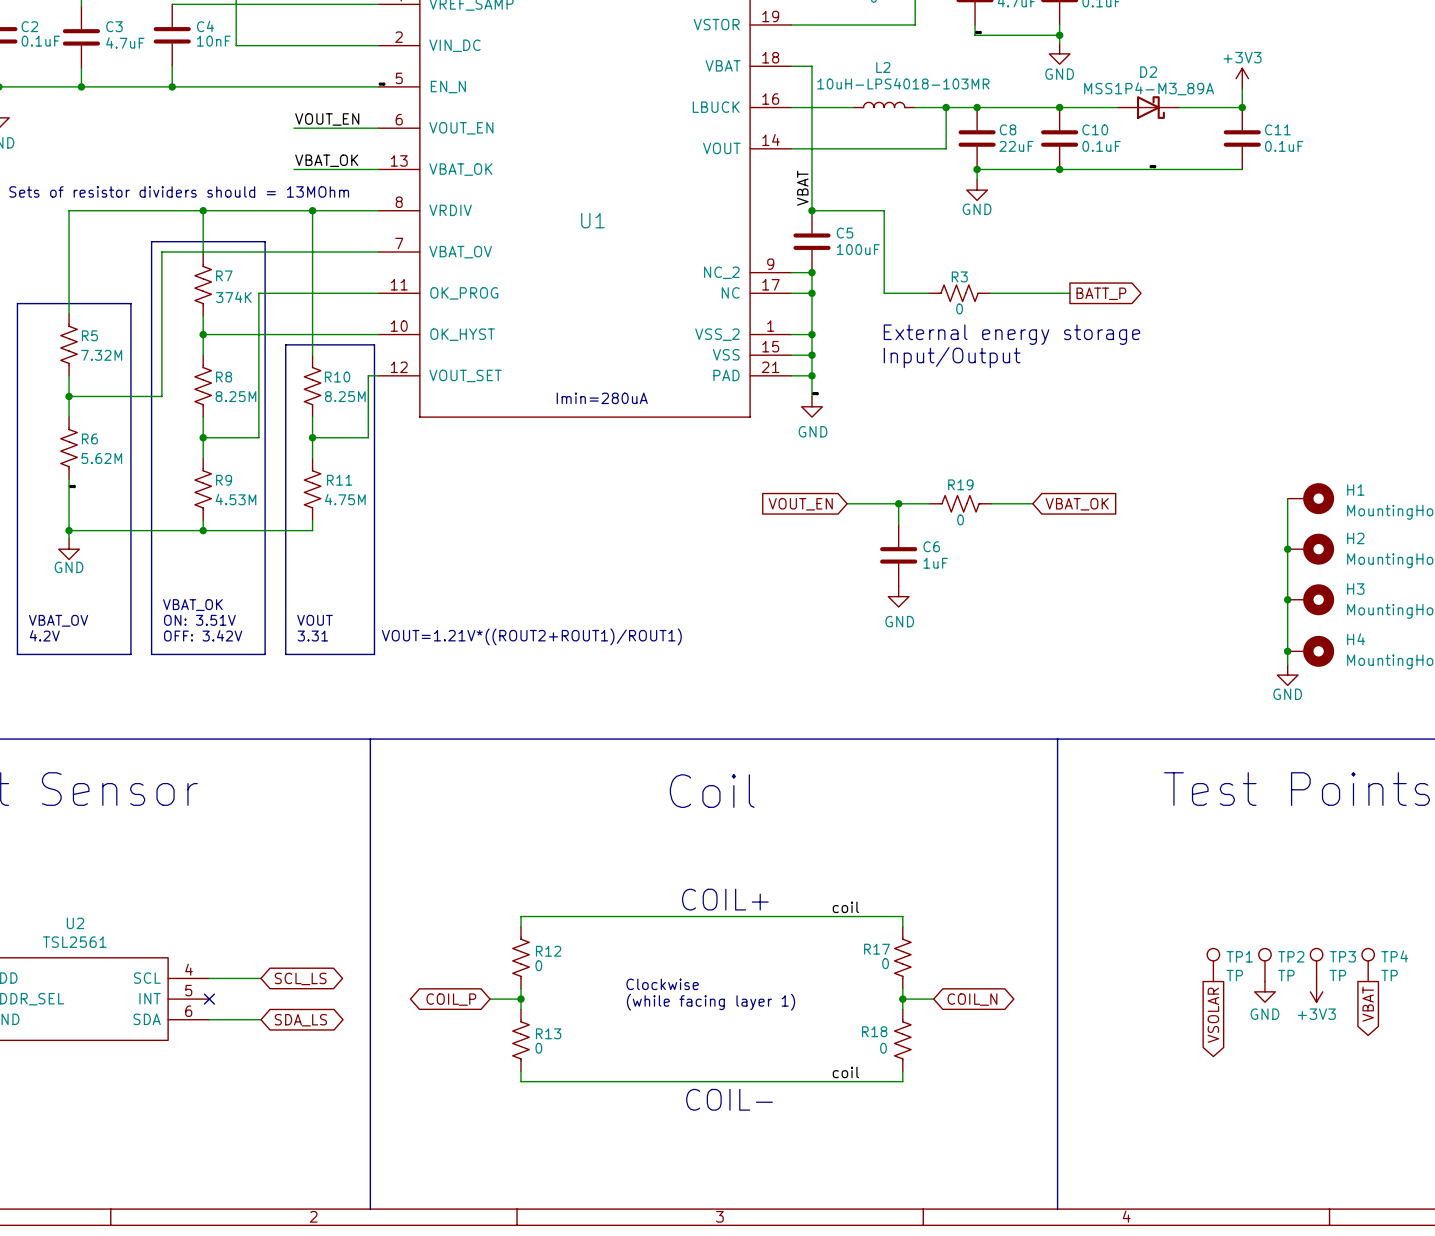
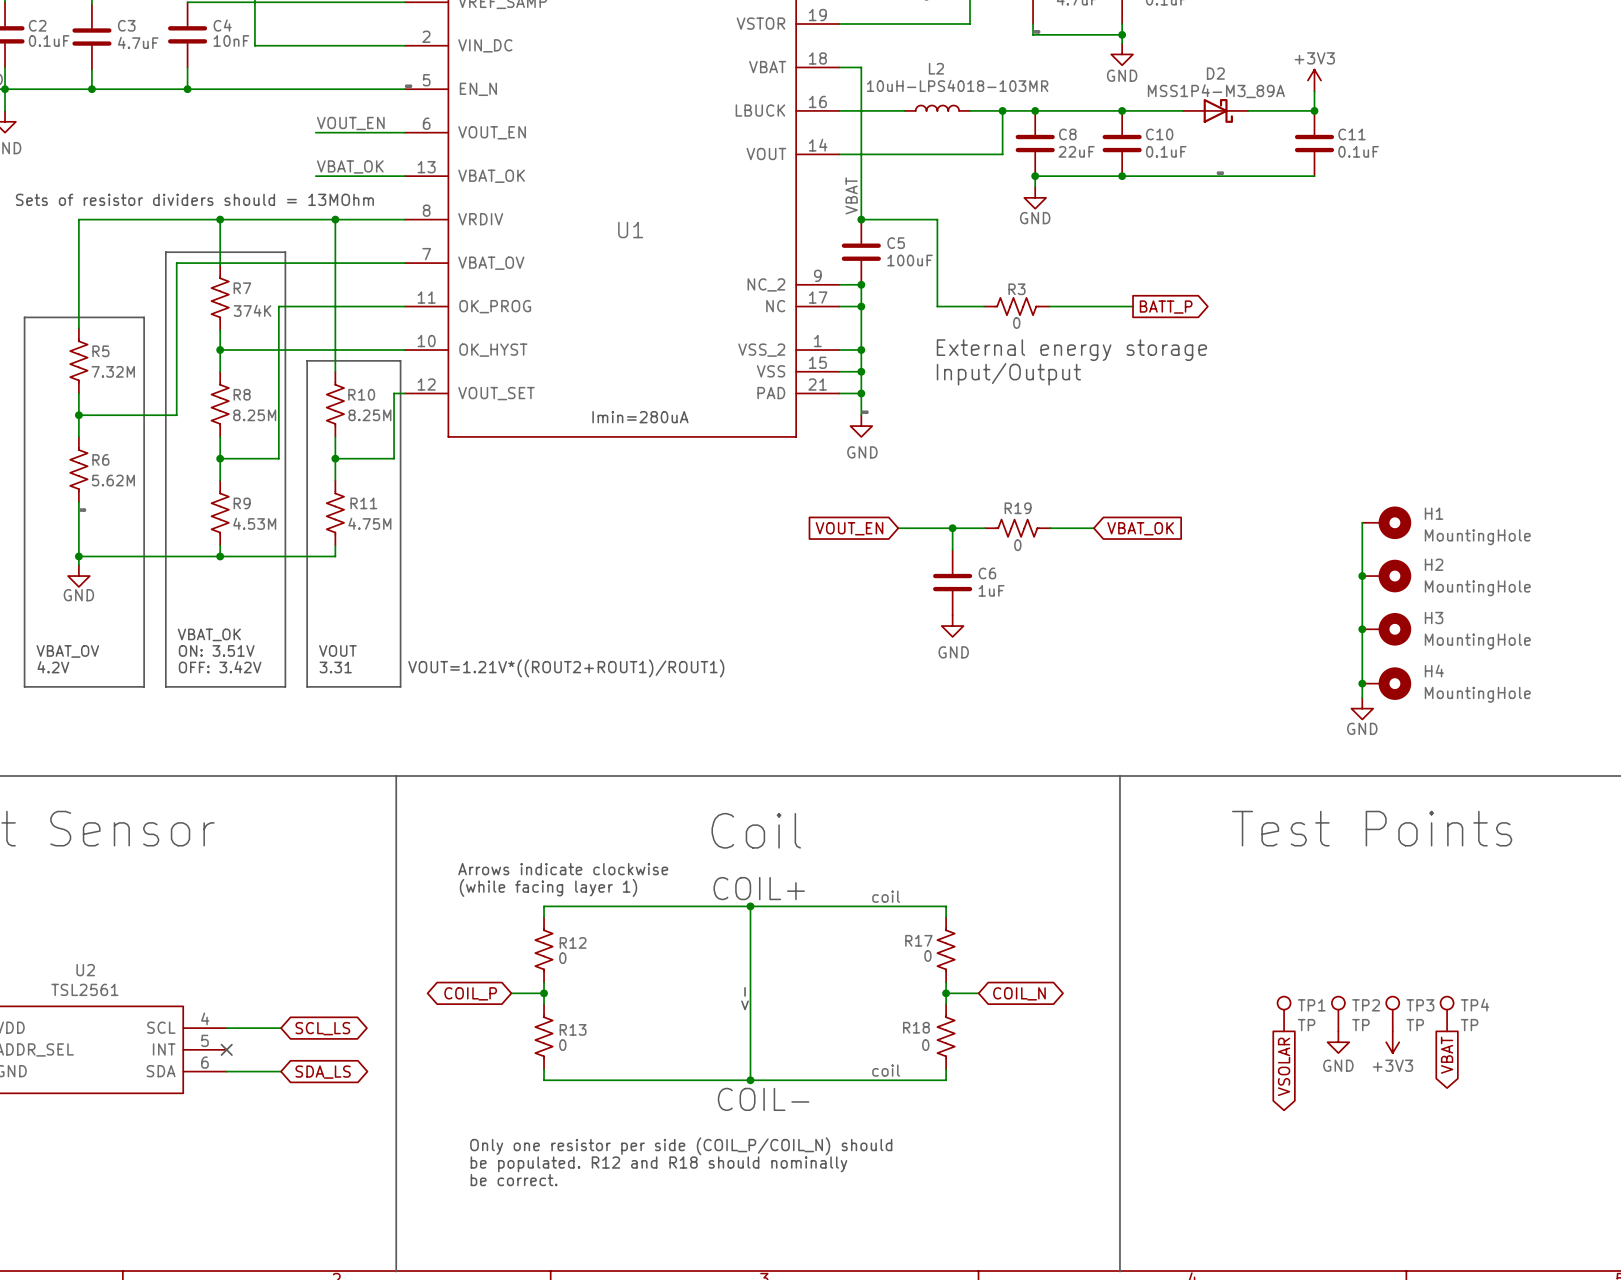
text: none -> Arrows indicate clockwise (563, 869)
text: none -> (while facing layer 1) (548, 887)
wire: none -> (750, 906) (750, 1080)
junction: none -> (750, 906)
text position: COIL+ (725, 899) -> COIL+ (759, 888)
label position: coil (845, 907) -> coil (886, 896)
wire: (521, 926) (521, 916) (902, 916) (902, 926) -> (544, 917) (544, 906) (946, 906) (946, 917)
junction: none -> (544, 993)
junction: none -> (946, 993)
text: none -> <- (745, 998)
R12 position: (521, 957) -> (544, 949)
R17 position: (902, 957) -> (946, 949)
text: Clockwise (662, 984) -> none
wire: (521, 988) (521, 1009) -> (544, 982) (544, 1004)
wire: (902, 988) (902, 1009) -> (946, 982) (946, 1004)
global label position: COIL_P (451, 999) -> COIL_P (470, 993)
wire: (490, 999) (521, 999) -> (511, 993) (544, 993)
junction: (521, 999) -> none
wire: (902, 999) (933, 999) -> (946, 993) (978, 993)
junction: (902, 999) -> none
global label position: COIL_N (972, 999) -> COIL_N (1019, 993)
text: (while facing layer 1) (710, 1002) -> none
junction: none -> (750, 1080)
R13 position: (521, 1040) -> (544, 1036)
R18 position: (902, 1040) -> (946, 1036)
wire: (521, 1071) (521, 1081) (902, 1081) (902, 1071) -> (544, 1069) (544, 1080) (946, 1080) (946, 1069)
label position: coil (845, 1072) -> coil (886, 1070)
text: none -> Only one resistor per side (COIL_P/COIL_N) should (681, 1146)
text position: COIL- (729, 1099) -> COIL- (763, 1099)
text: none -> be populated. R12 and R18 should nominally (658, 1164)
text: none -> be correct. (514, 1180)

